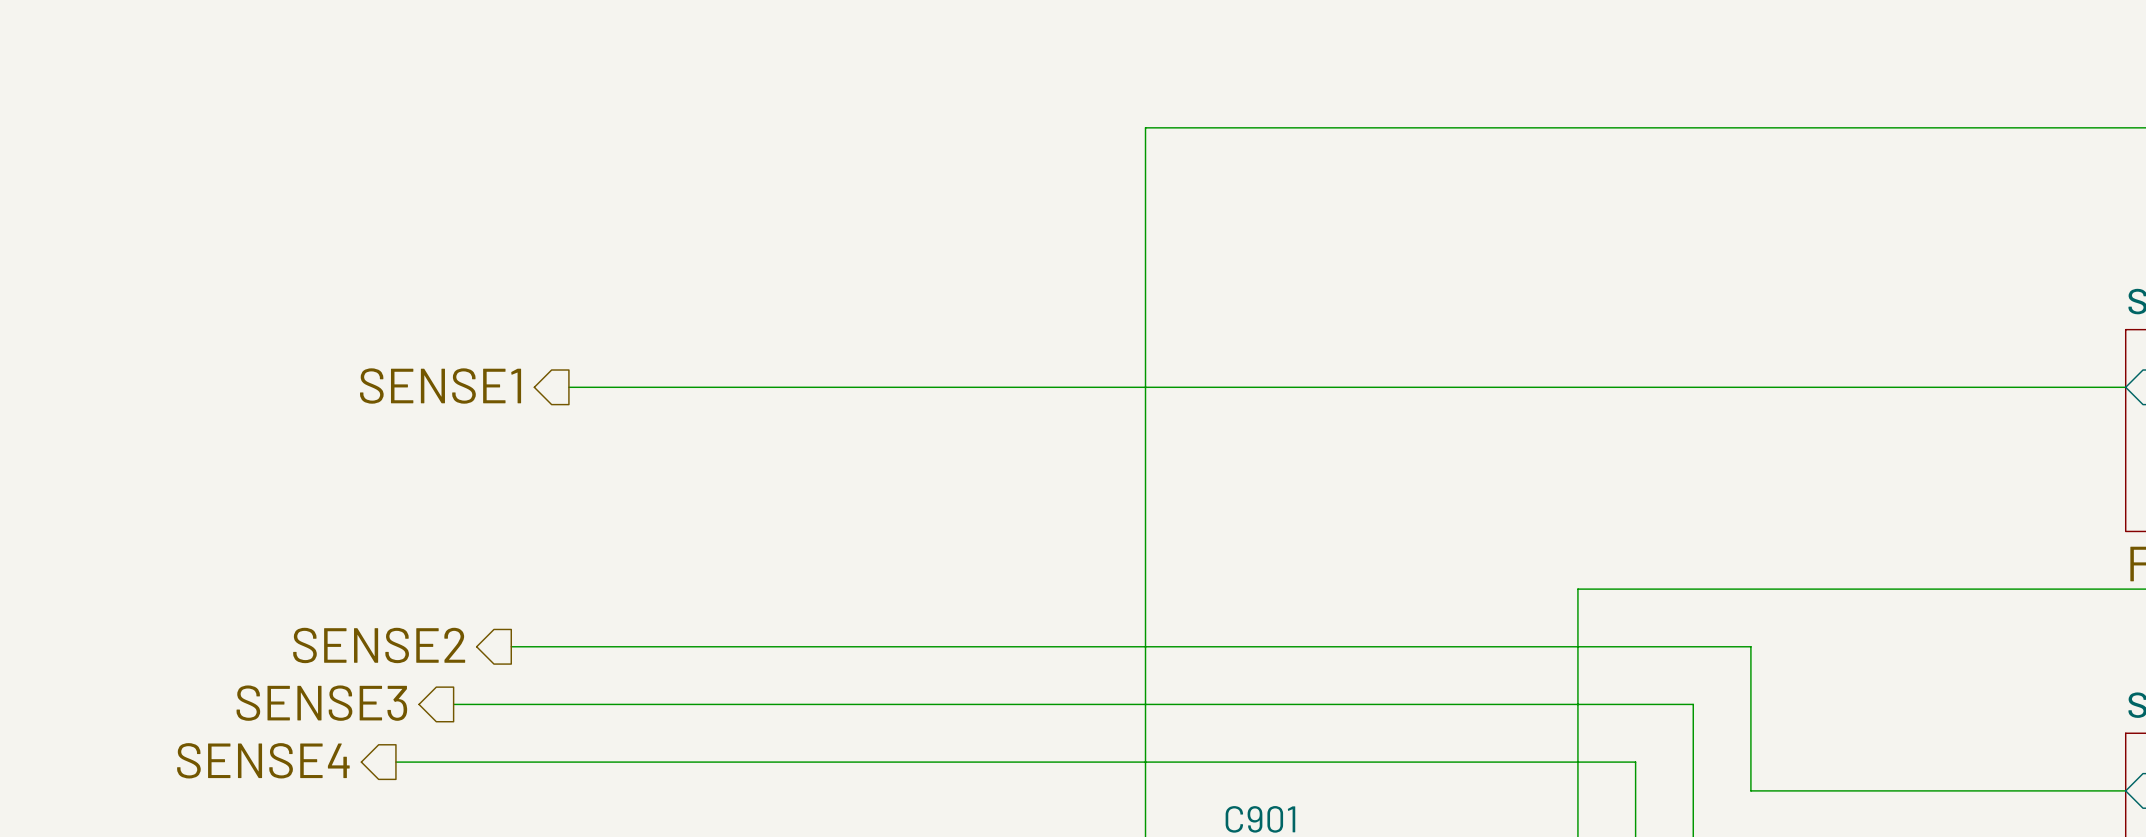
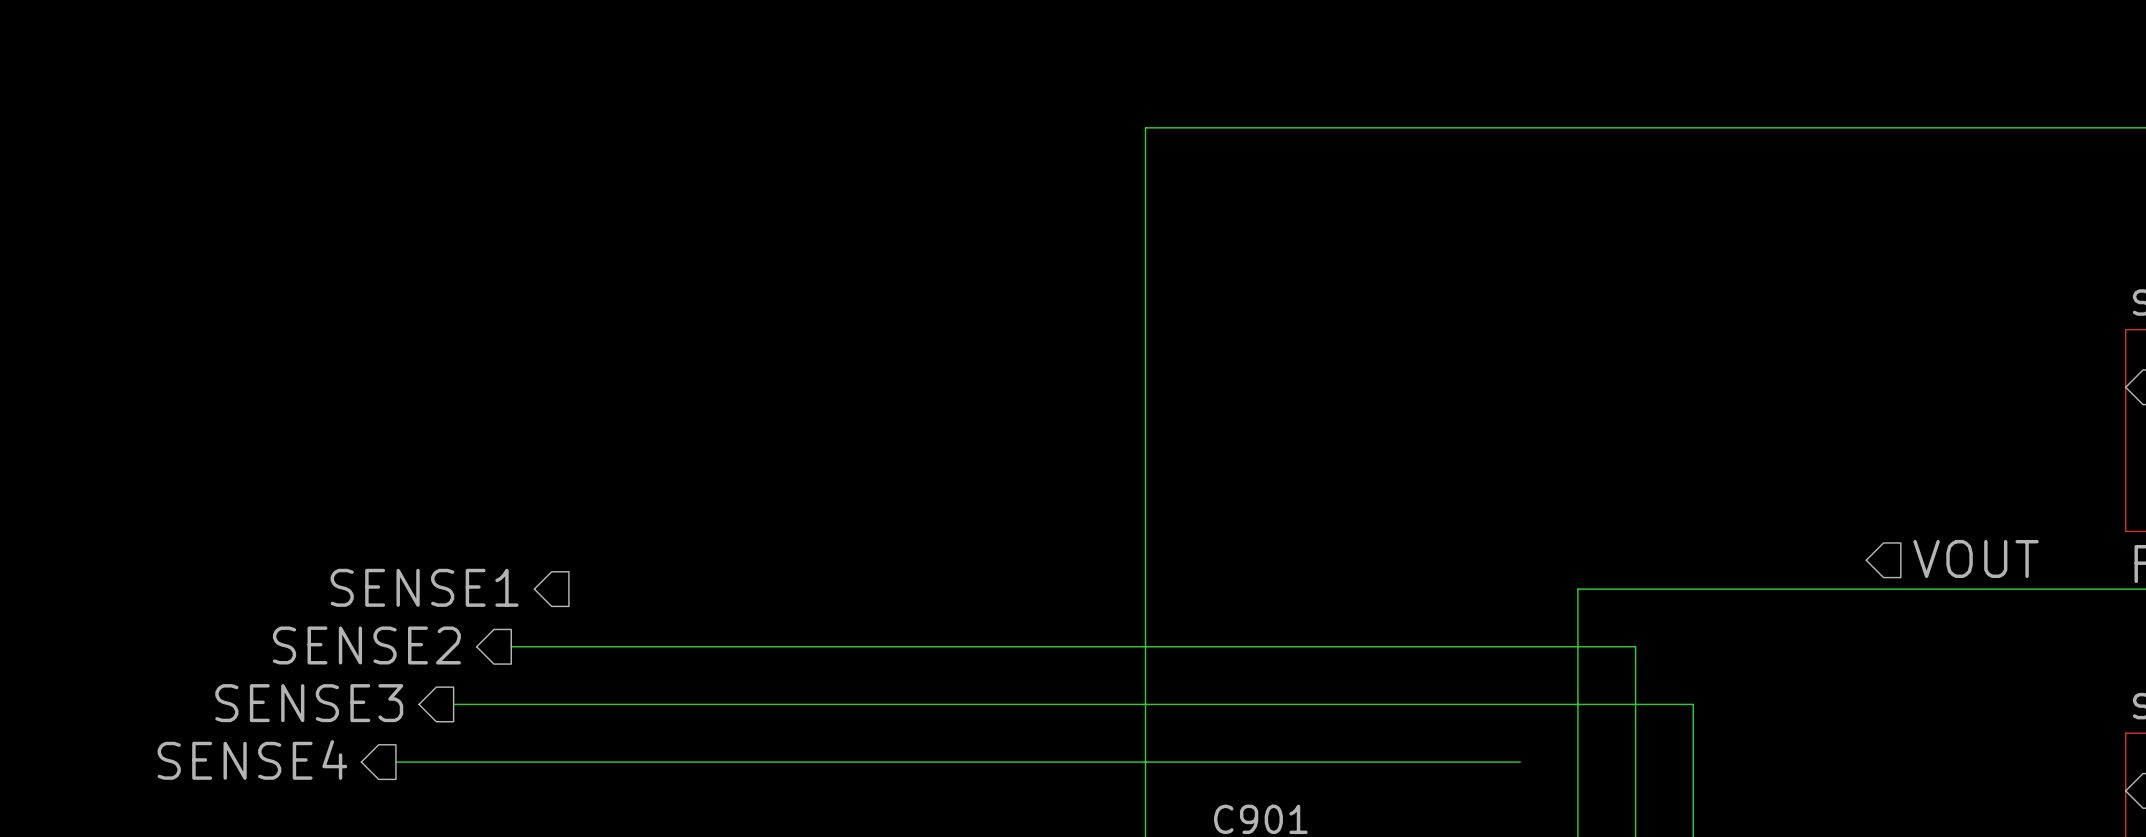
hierarchical label position: SENSE1 (440, 386) -> SENSE1 (424, 587)
wire: (568, 387) (2125, 387) -> none
sheet pin: none -> VOUT (1976, 558)
wire: (1635, 646) (1750, 646) (1750, 790) (2125, 790) -> none
wire: (1520, 762) (1635, 762) -> (1635, 646) (1635, 762)

